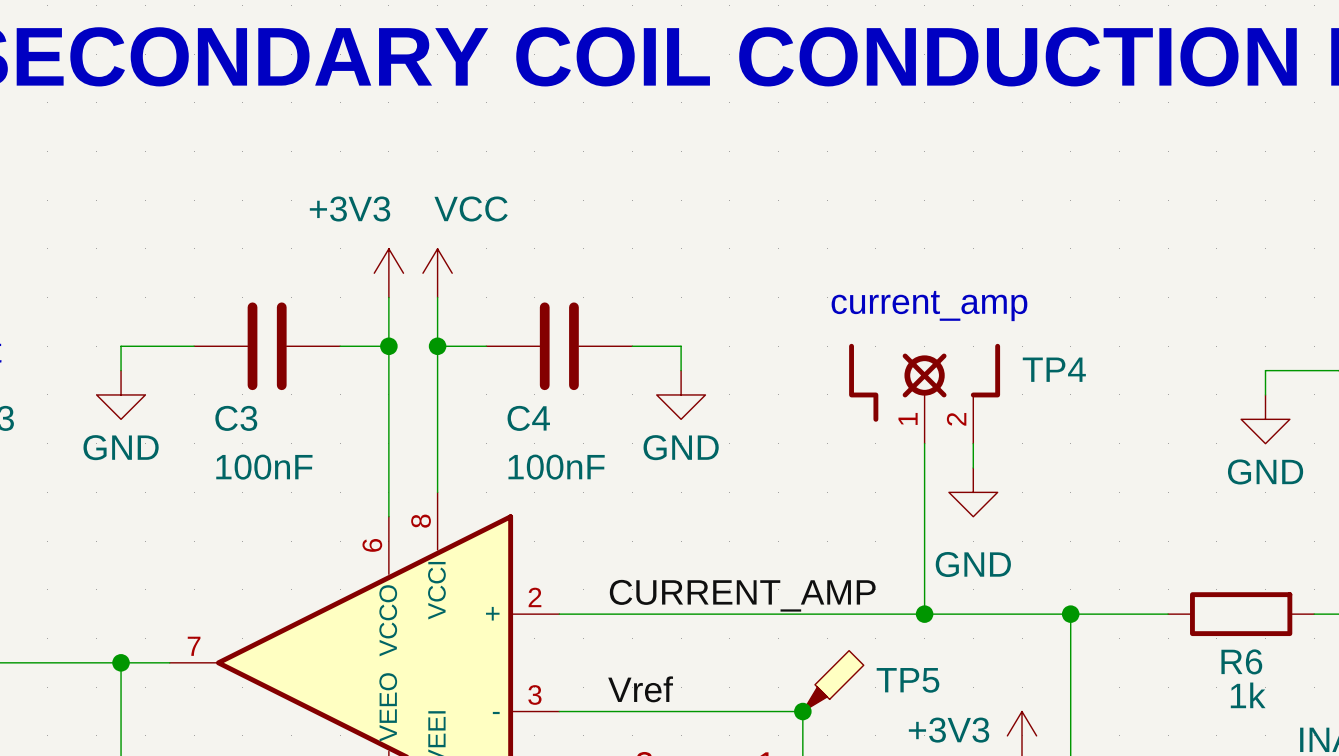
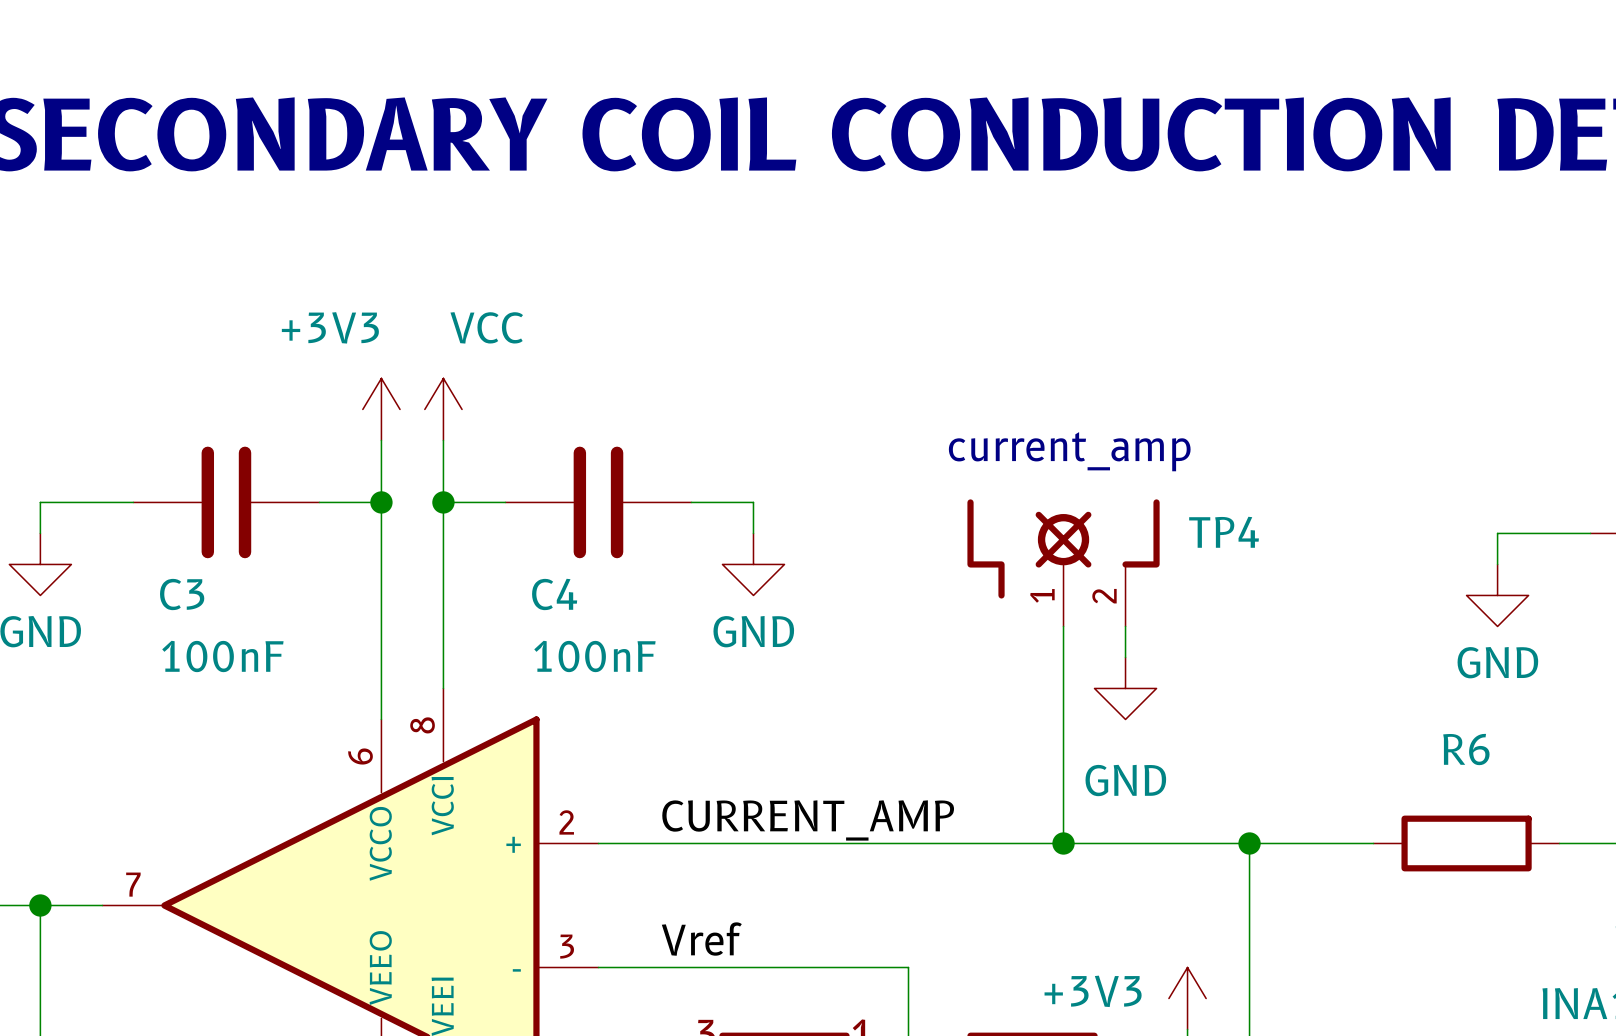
R6 name position: R6 (1241, 661) -> R6 (1466, 749)
TP5: (833, 681) -> none
R6 value: 1k (1248, 695) -> none
junction: (802, 711) -> none

